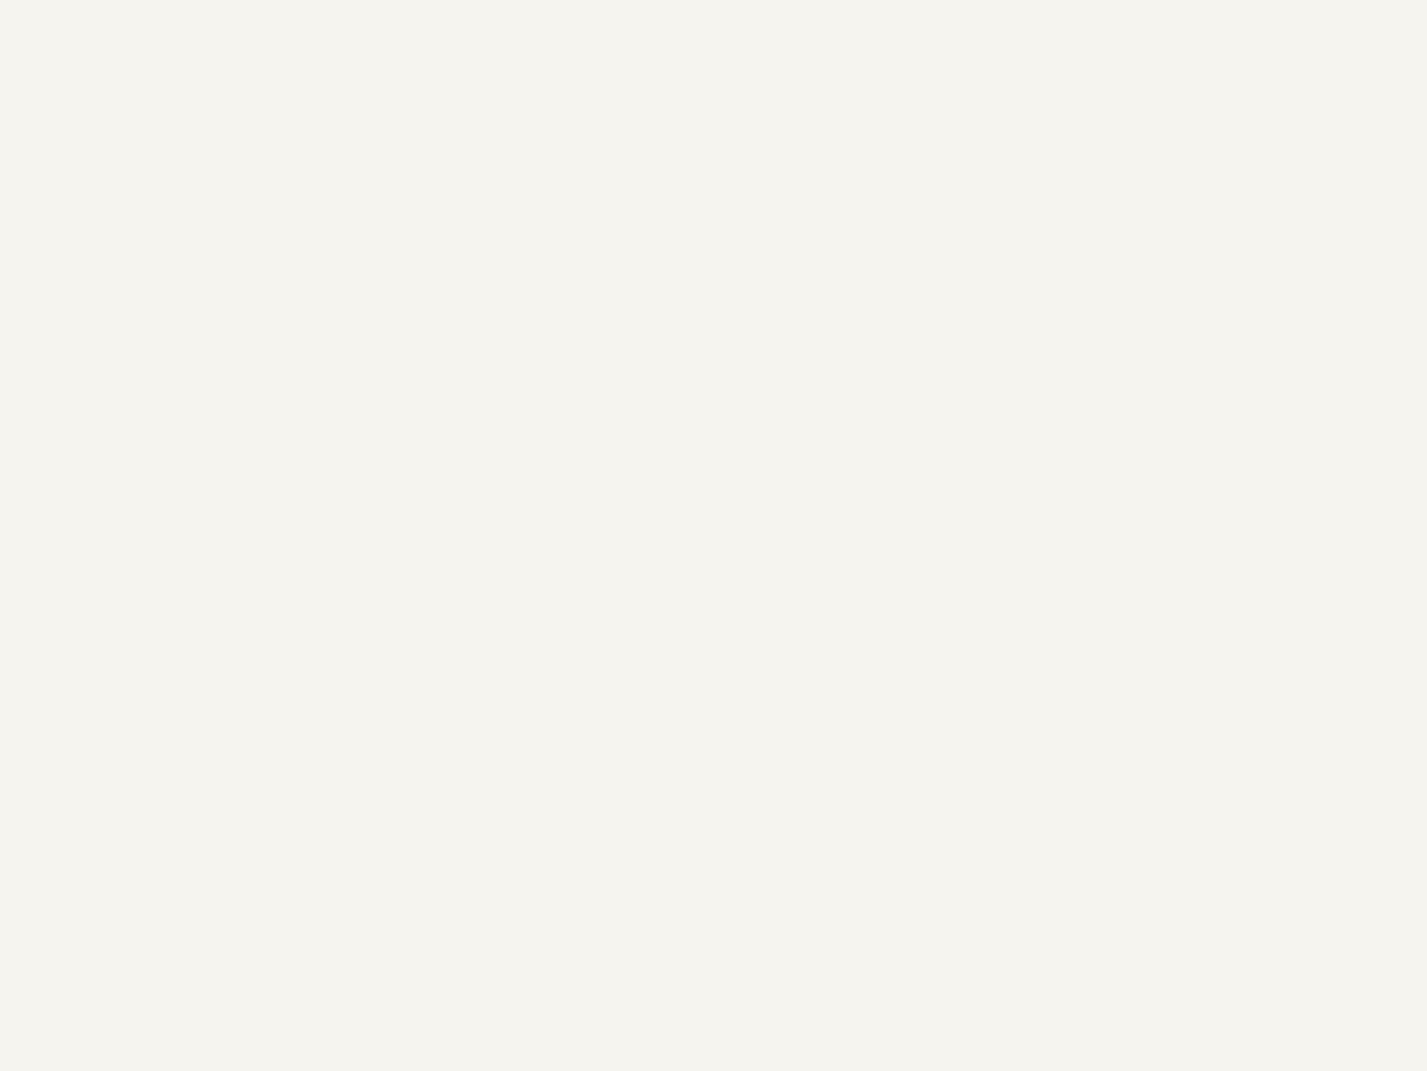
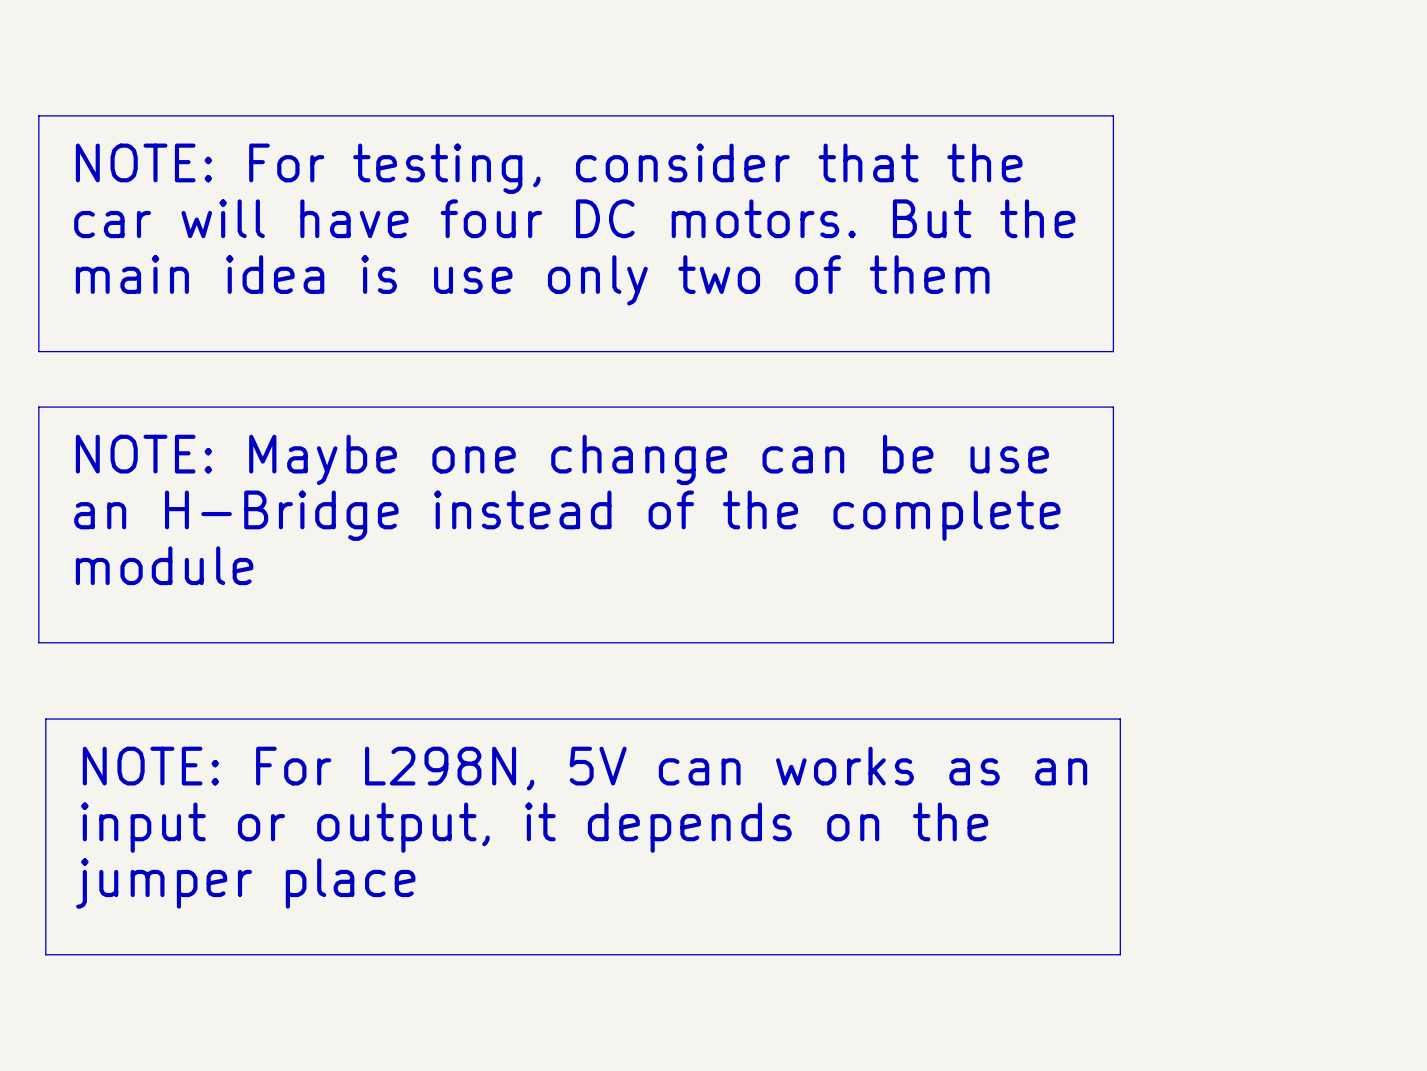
line: none -> (38, 115) (38, 351) (1113, 351) (1113, 115) (38, 115)
text: none -> NOTE: For testing, consider that the (549, 168)
text: none -> car will have four DC motors. But the (574, 218)
text: none -> main idea is use only two of them (532, 280)
line: none -> (38, 407) (1113, 407) (1113, 642) (38, 642) (38, 407)
text: none -> NOTE: Maybe one change can be use (562, 459)
text: none -> an H-Bridge instead of the complete (567, 515)
text: none -> module (164, 565)
line: none -> (45, 719) (1120, 719) (1120, 954) (45, 954) (45, 719)
text: none -> NOTE: For L298N, 5V can works as an (584, 768)
text: none -> input or output, it depends on the (534, 827)
text: none -> jumper place (245, 883)

